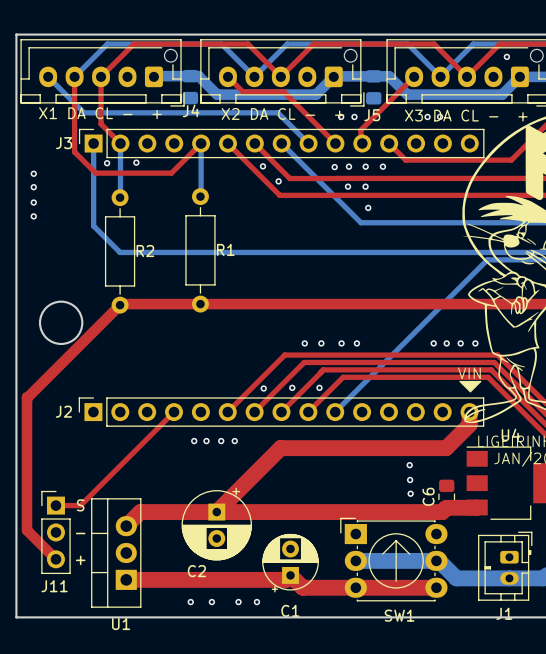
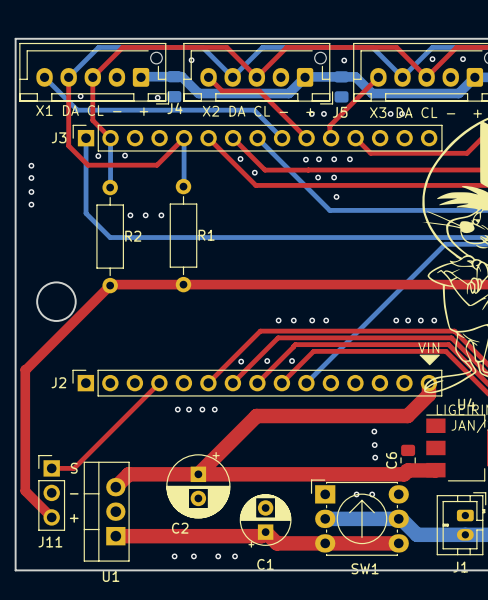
via: none -> (432, 59)
via: none -> (191, 60)
via: none -> (344, 60)
via: none -> (80, 96)
via: none -> (157, 97)
via: none -> (130, 215)
via: none -> (145, 215)
via: none -> (161, 215)
via: none -> (356, 494)
via: none -> (372, 494)

